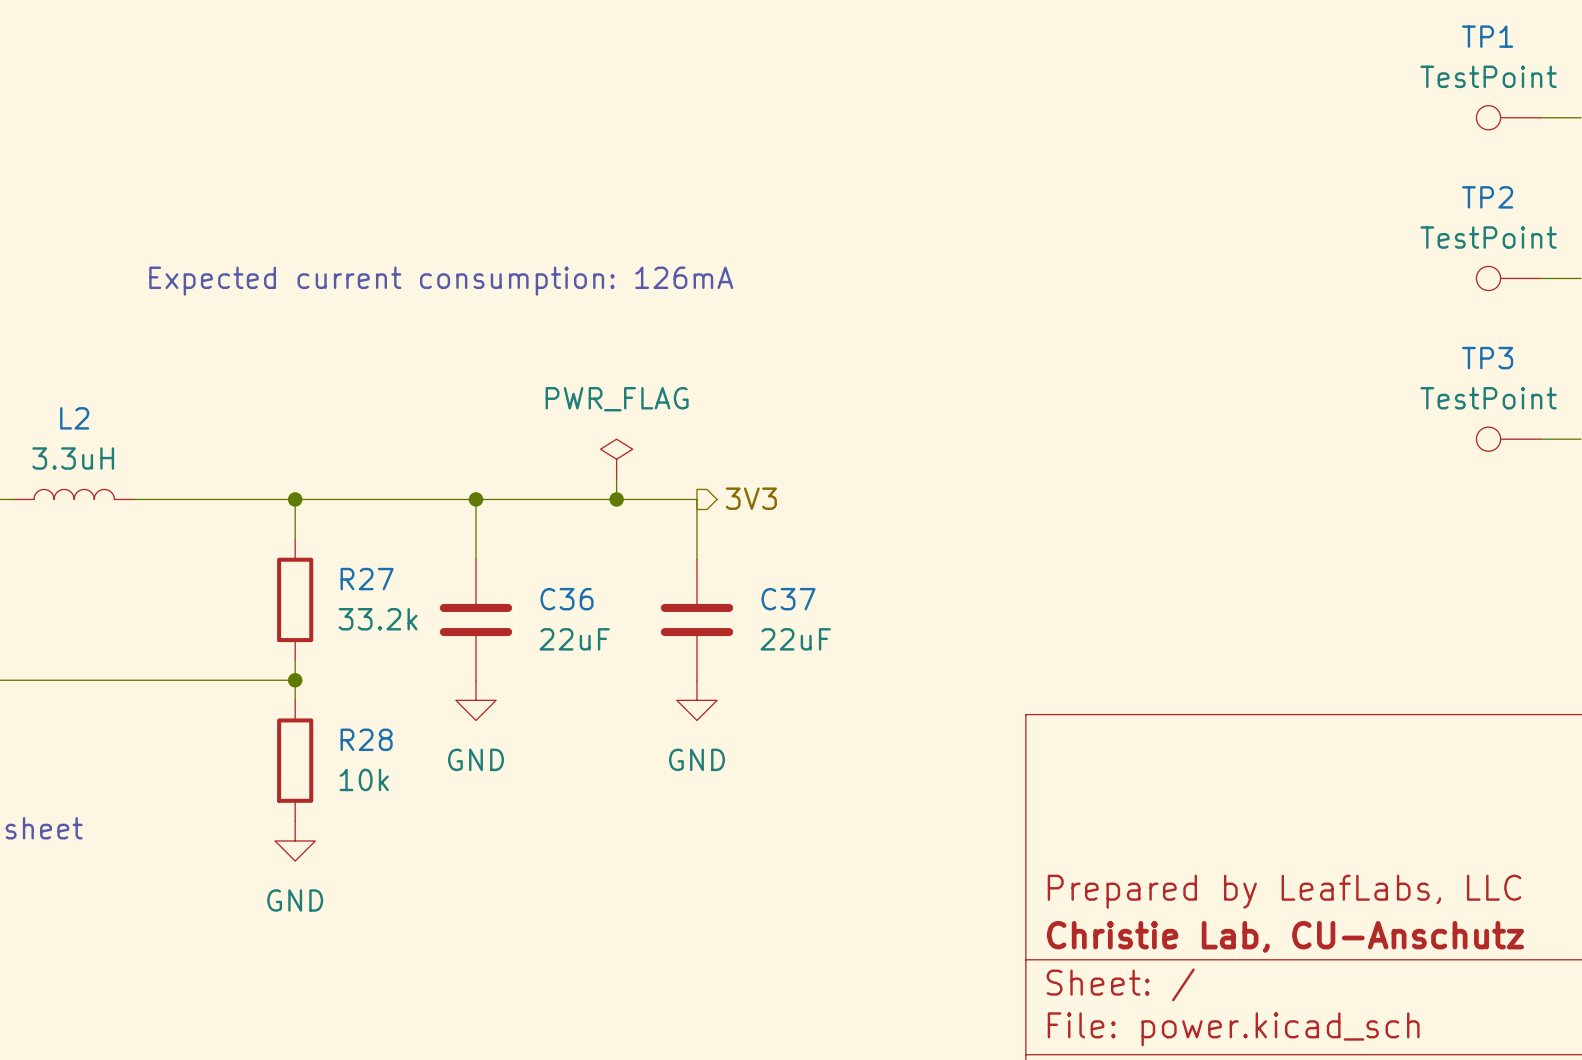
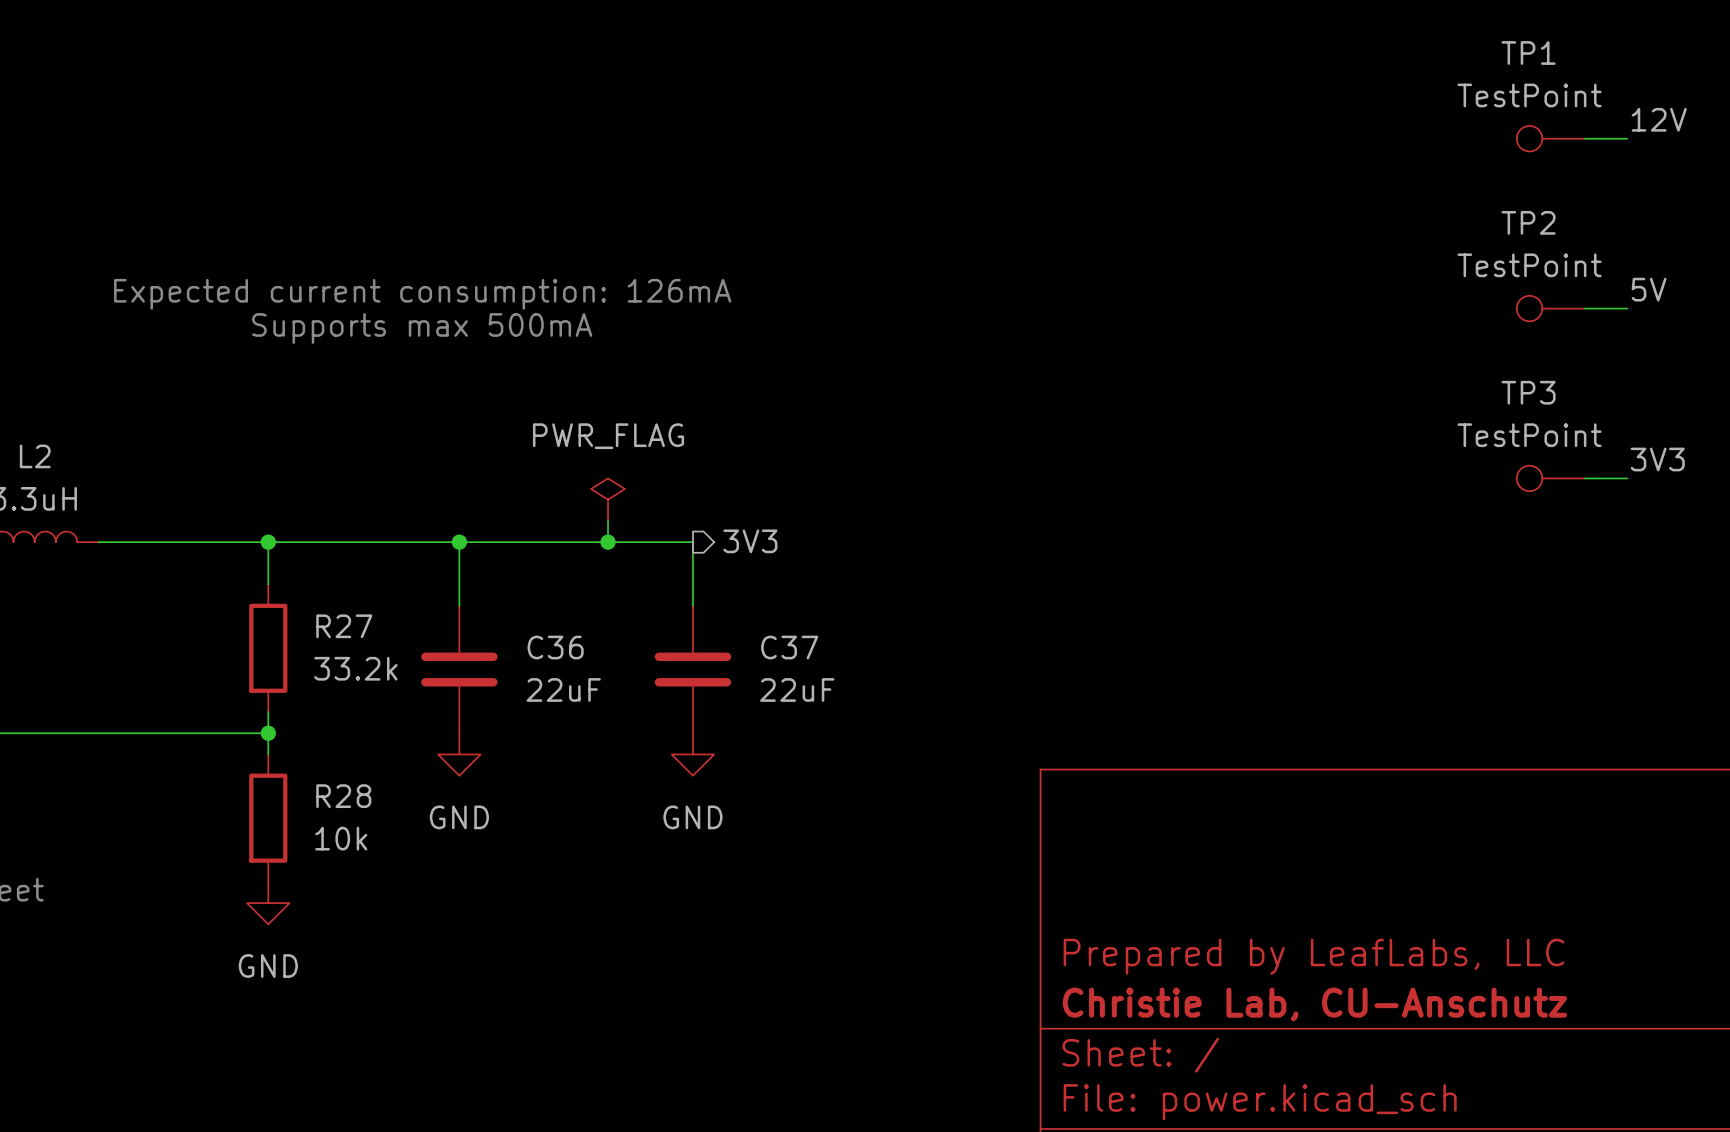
text position: Expected current consumption: 126mA (441, 281) -> Expected current consumption: 126mA (422, 294)
text: none -> Supports max 500mA (422, 328)

